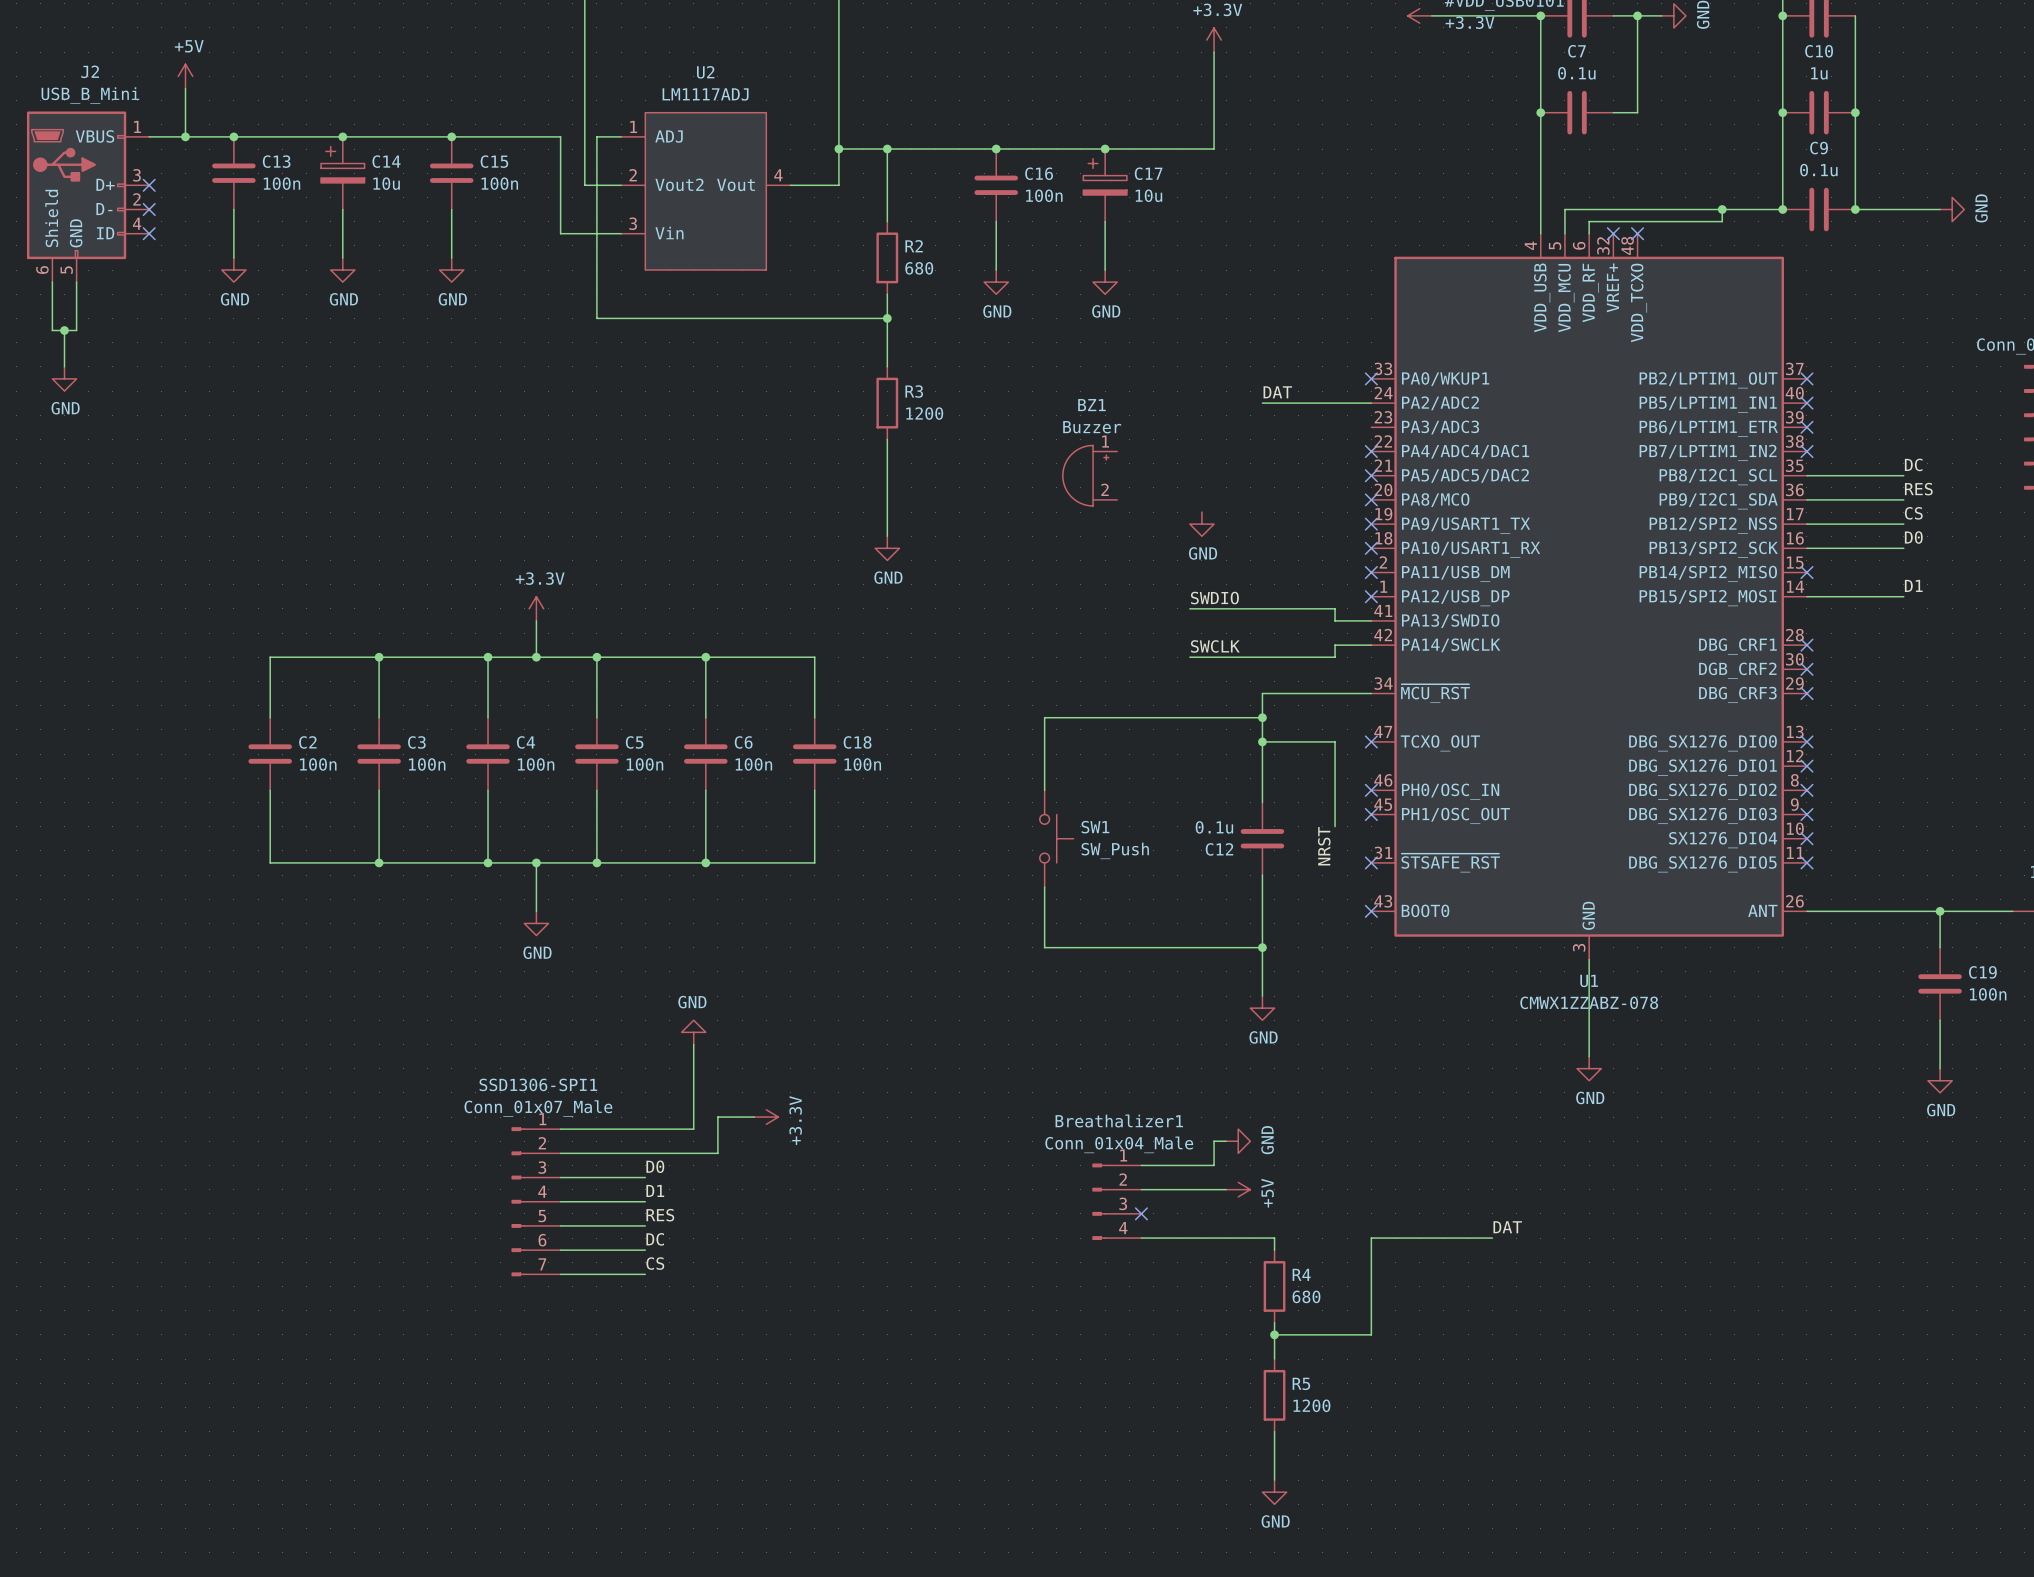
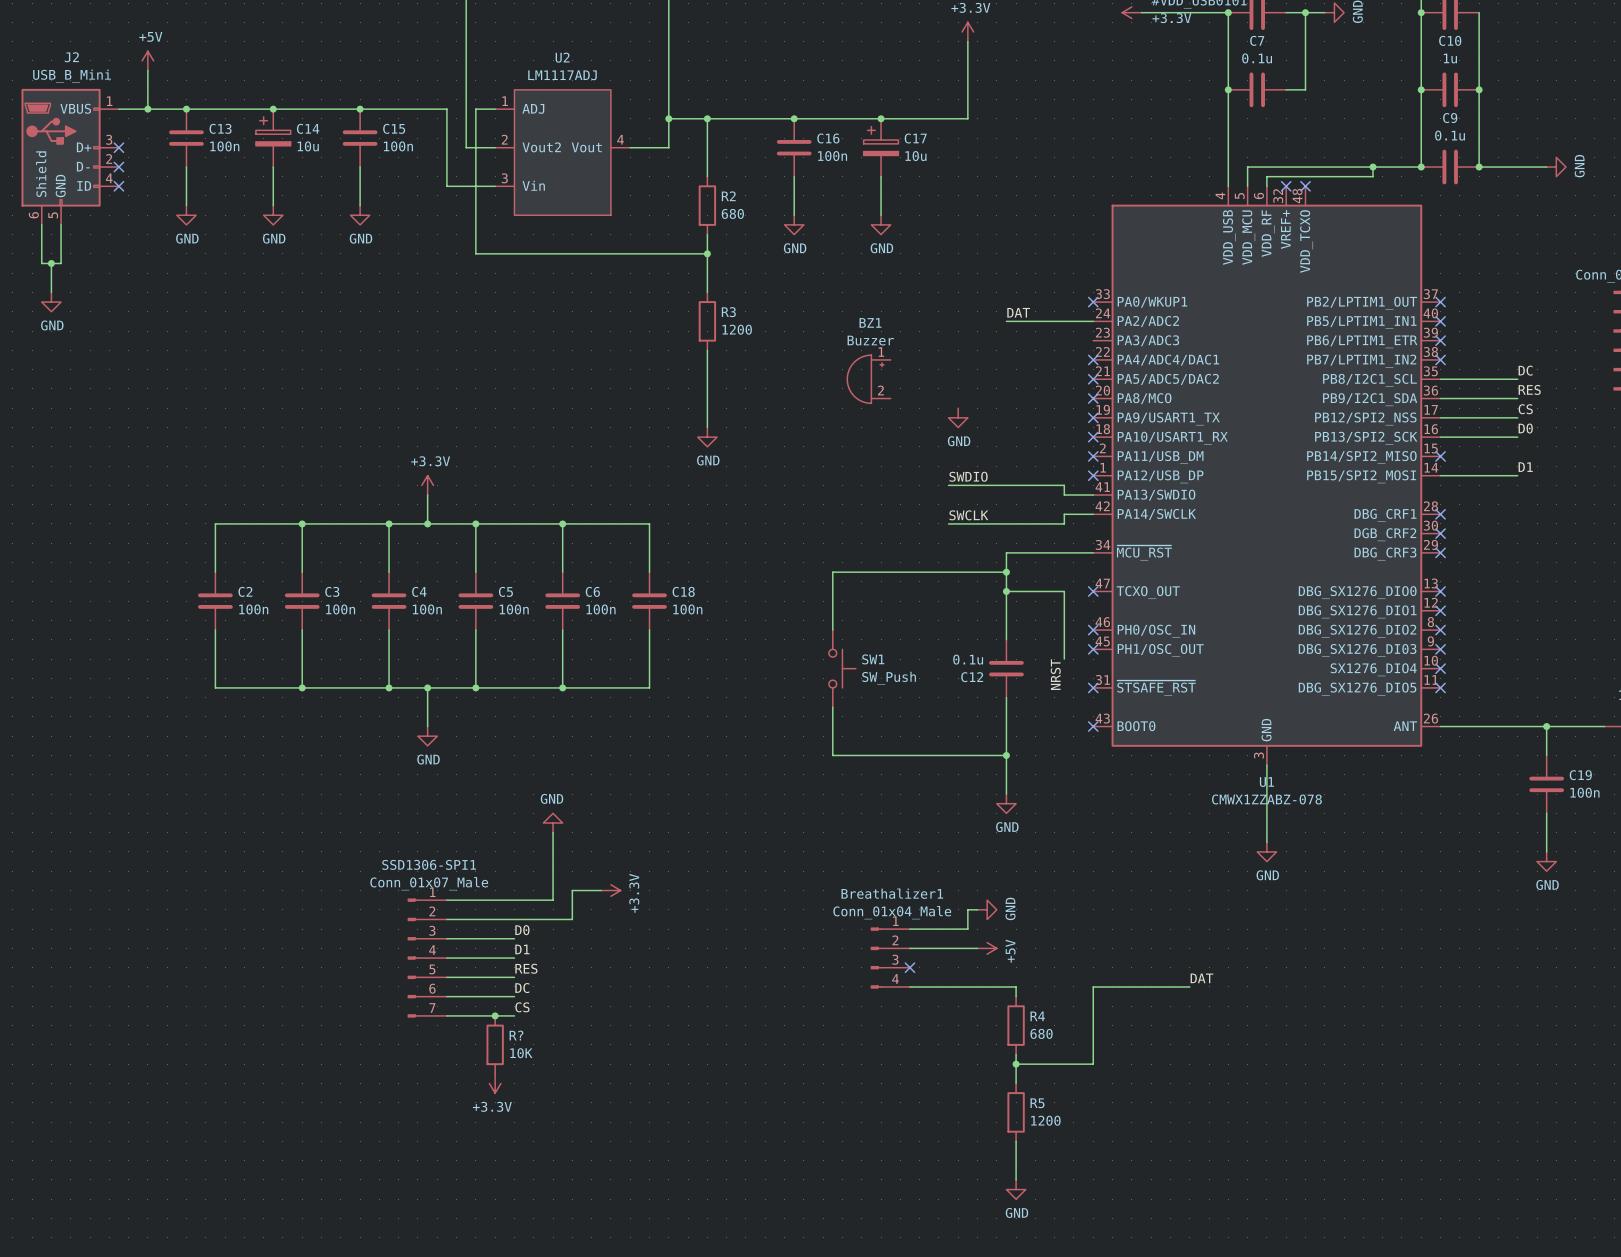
junction: none -> (495, 1015)
R?: none -> 10K (495, 1044)
power symbol: none -> +3.3V (495, 1083)

